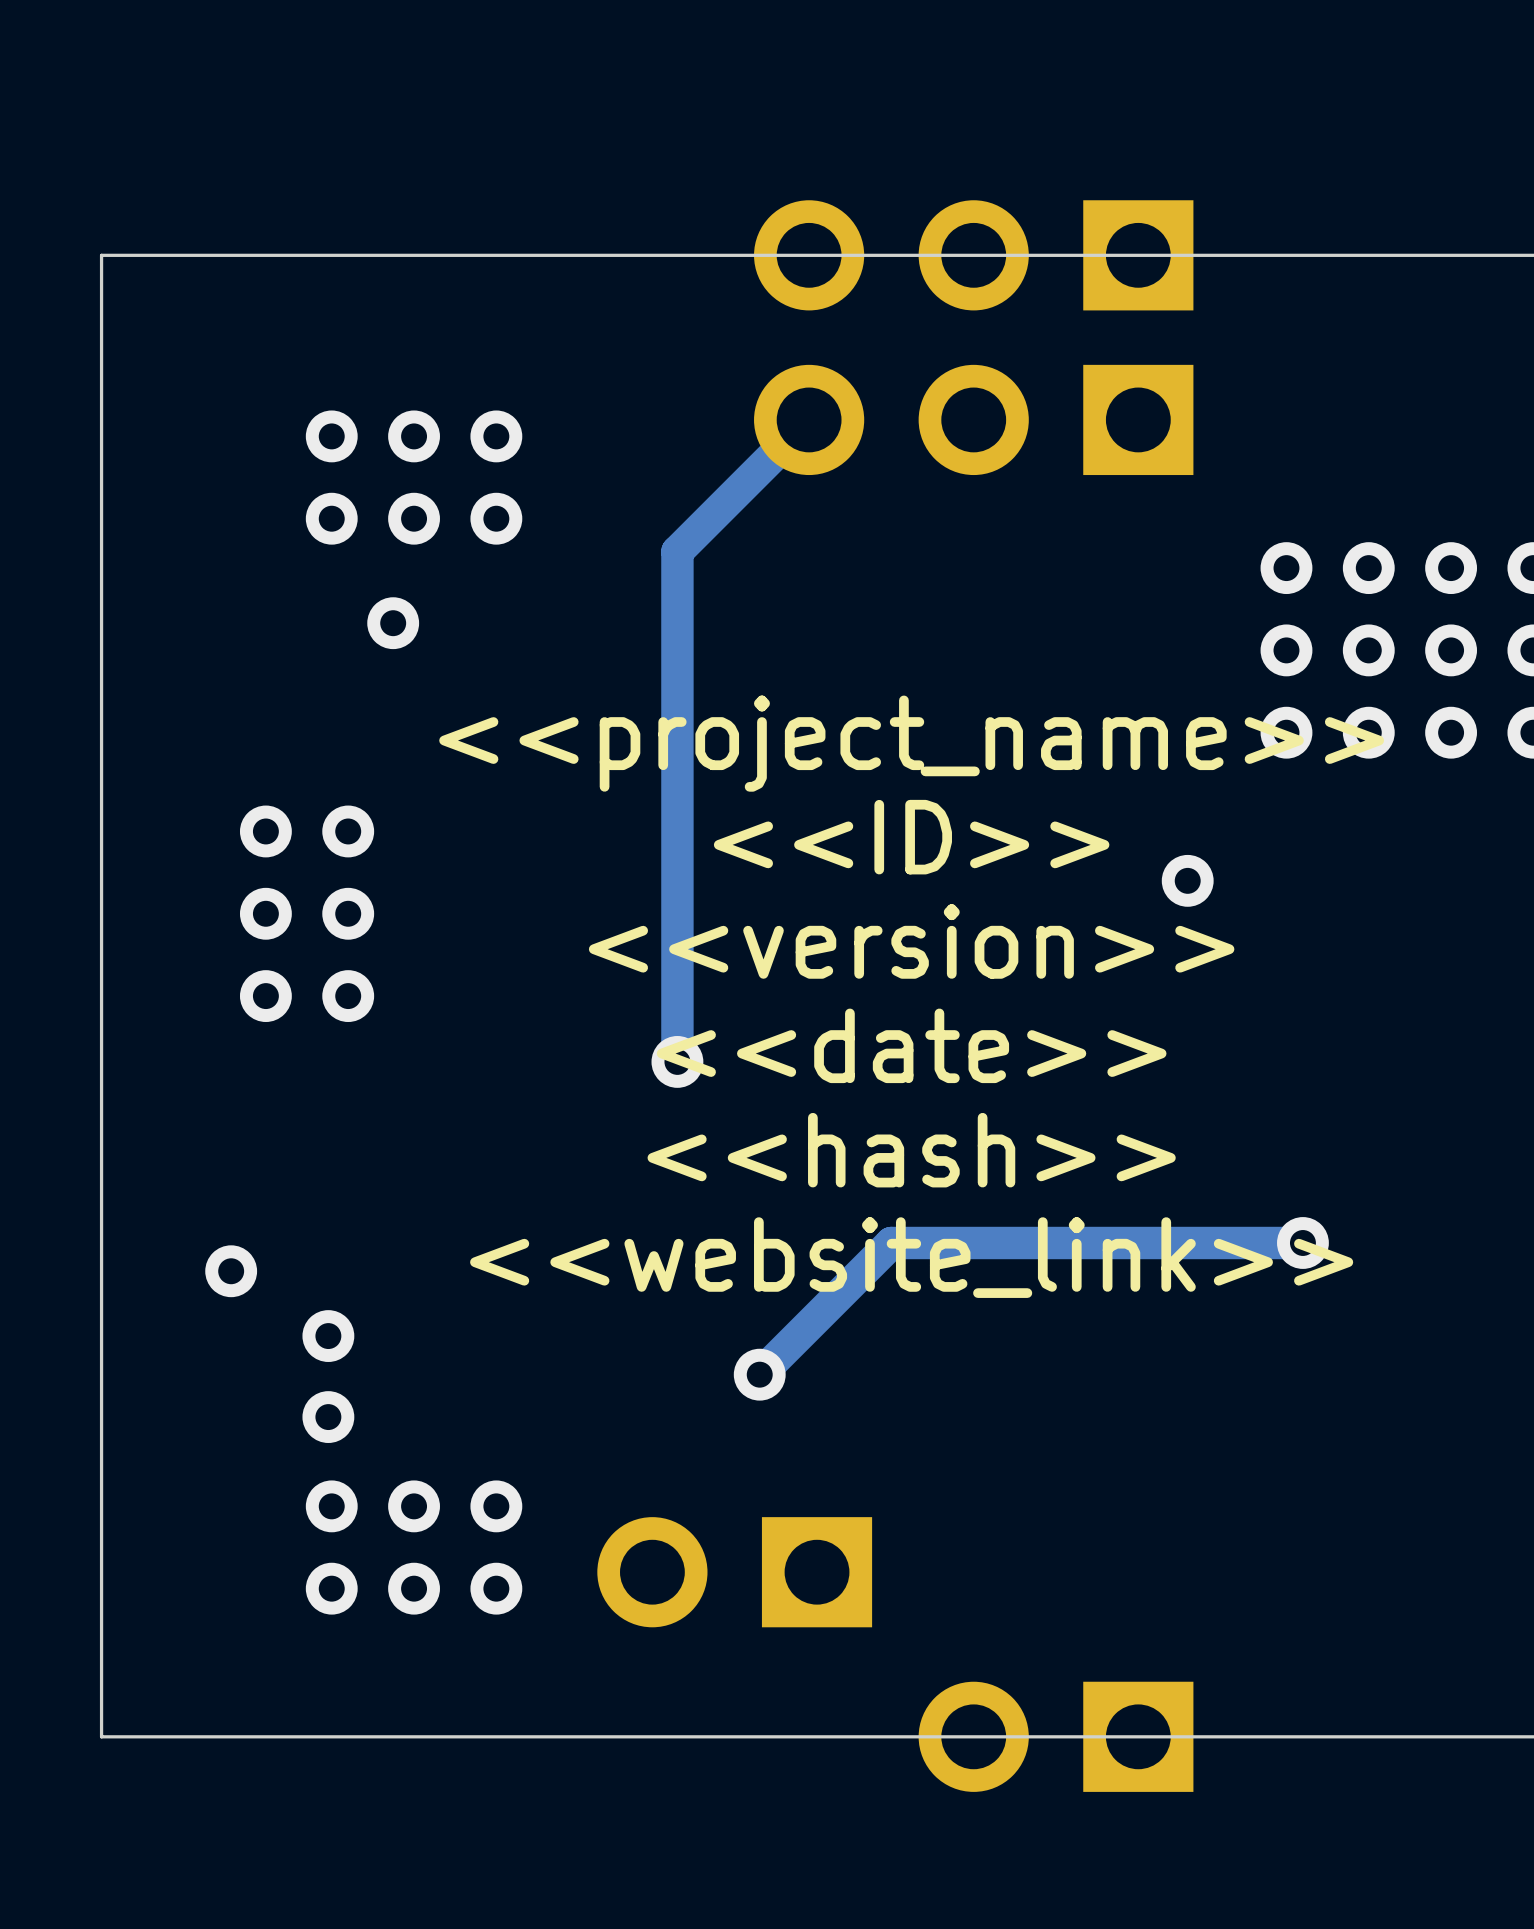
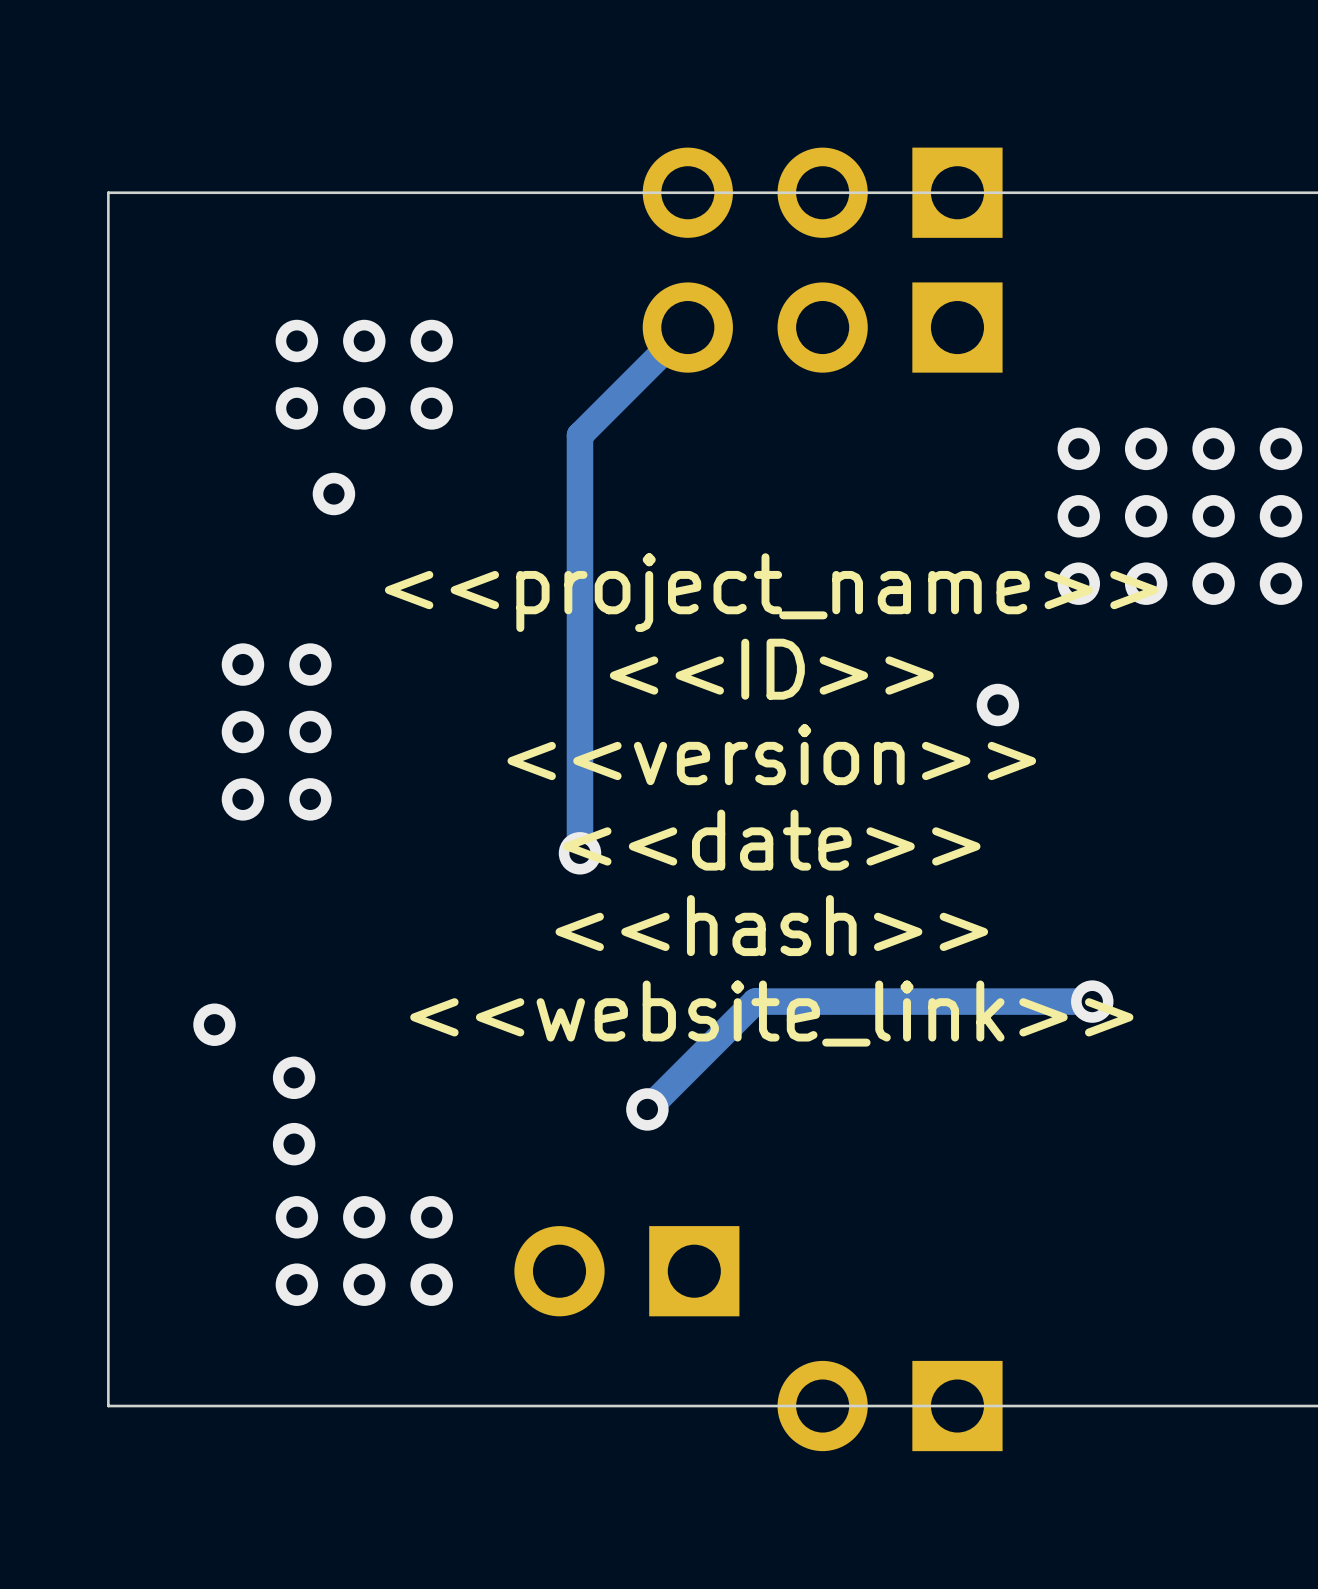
via position: (393, 623) -> (333, 493)

